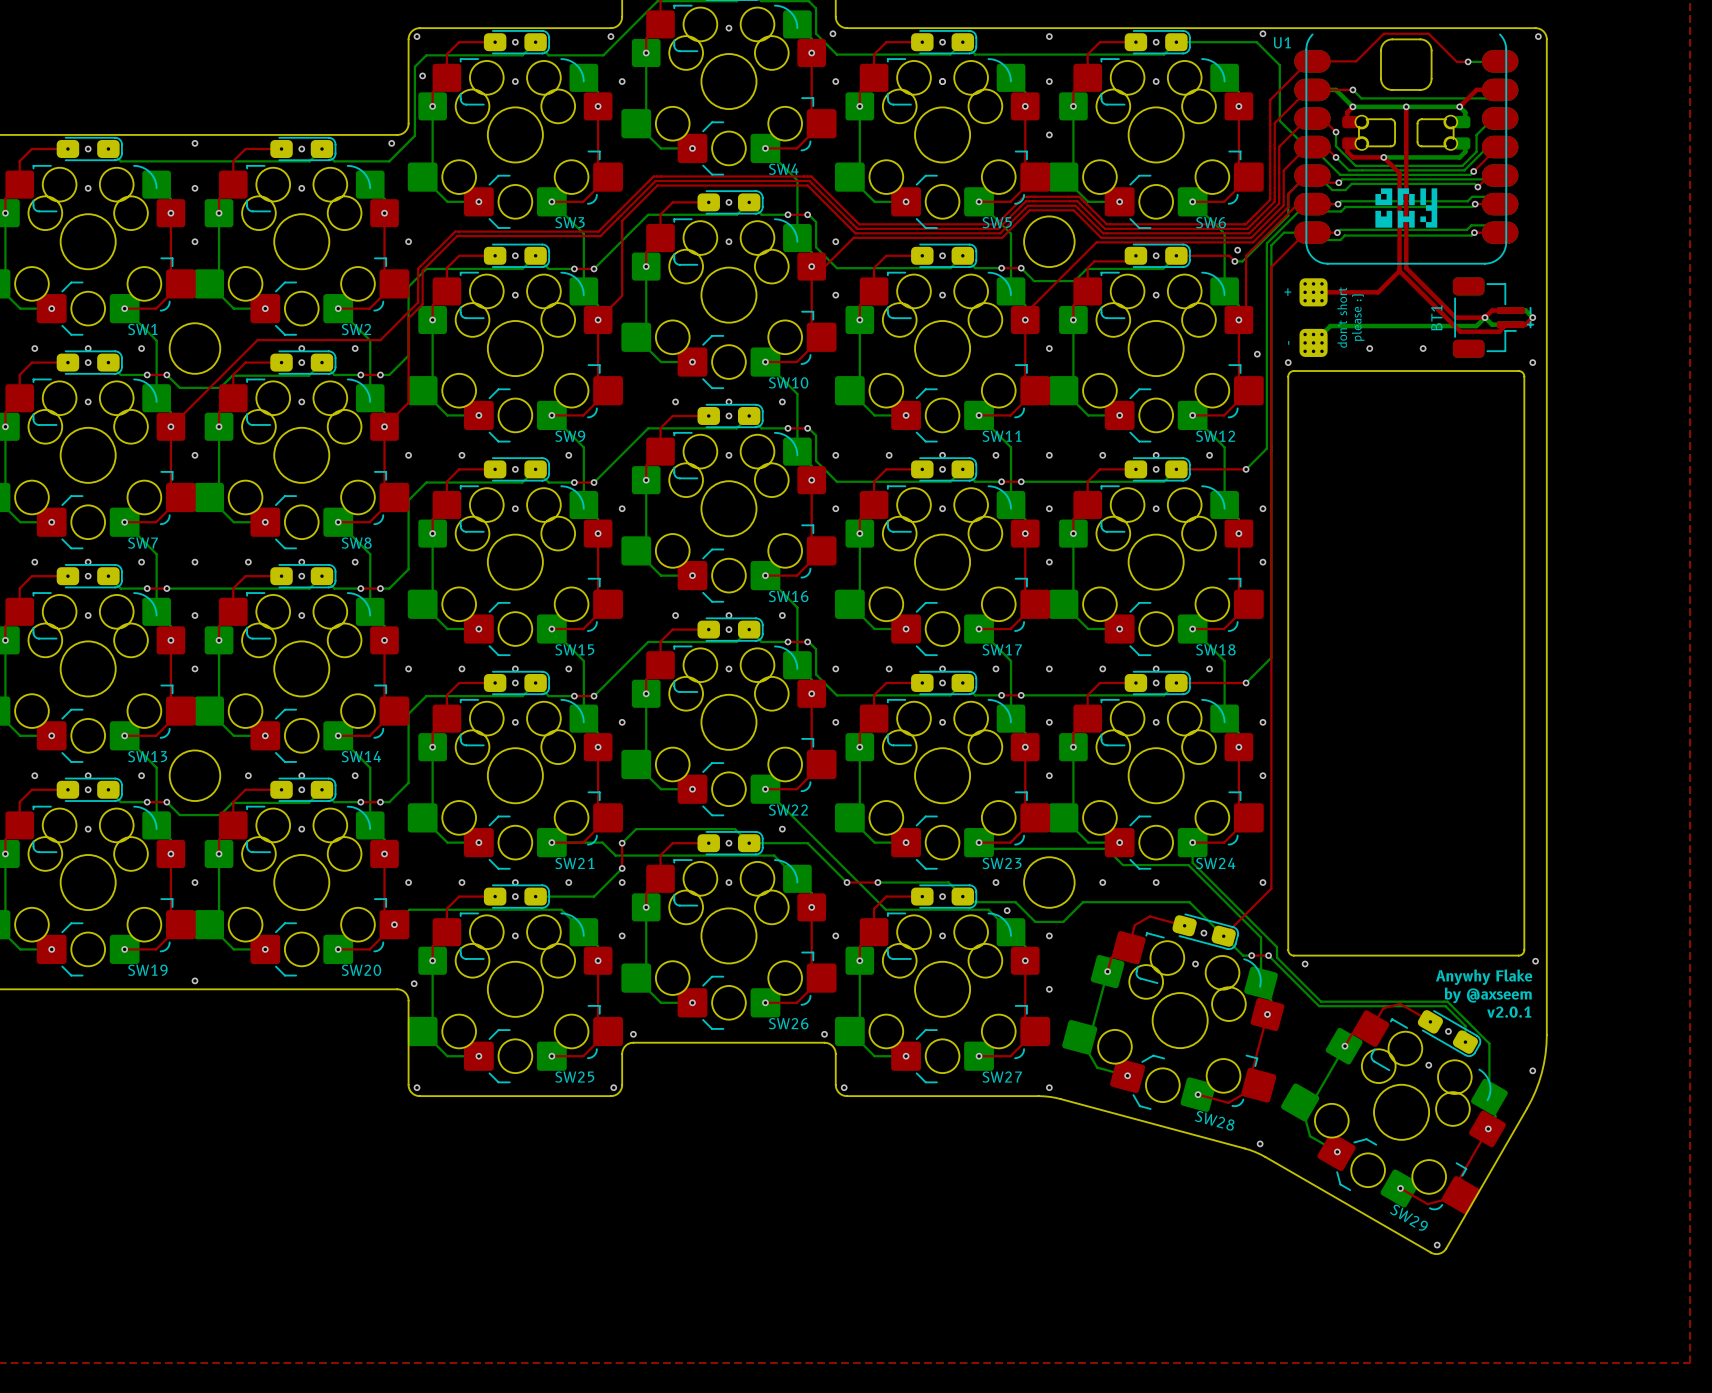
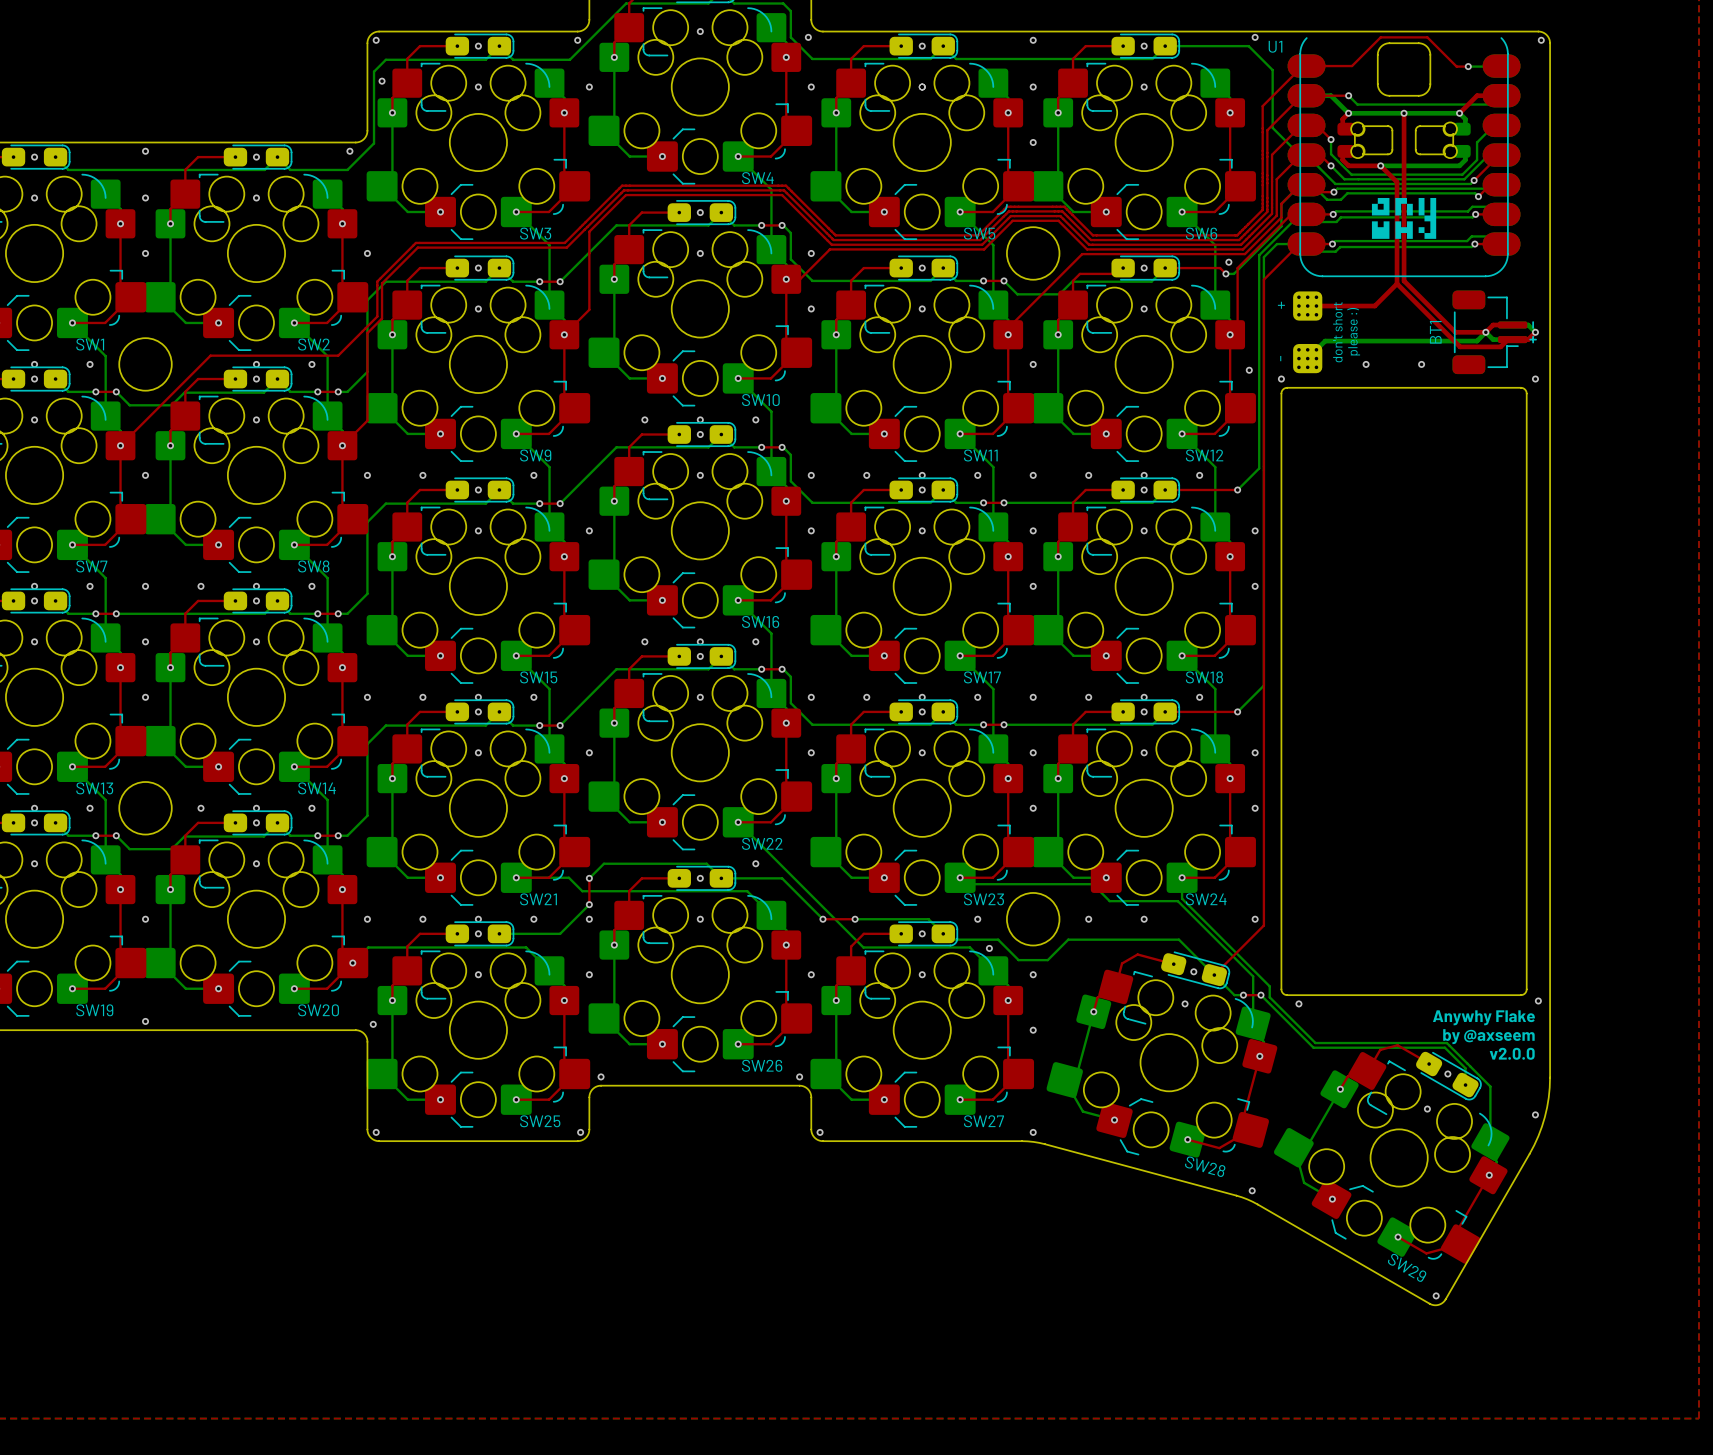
text: v2.0.1 (1509, 1012) -> v2.0.0 (1512, 1053)

